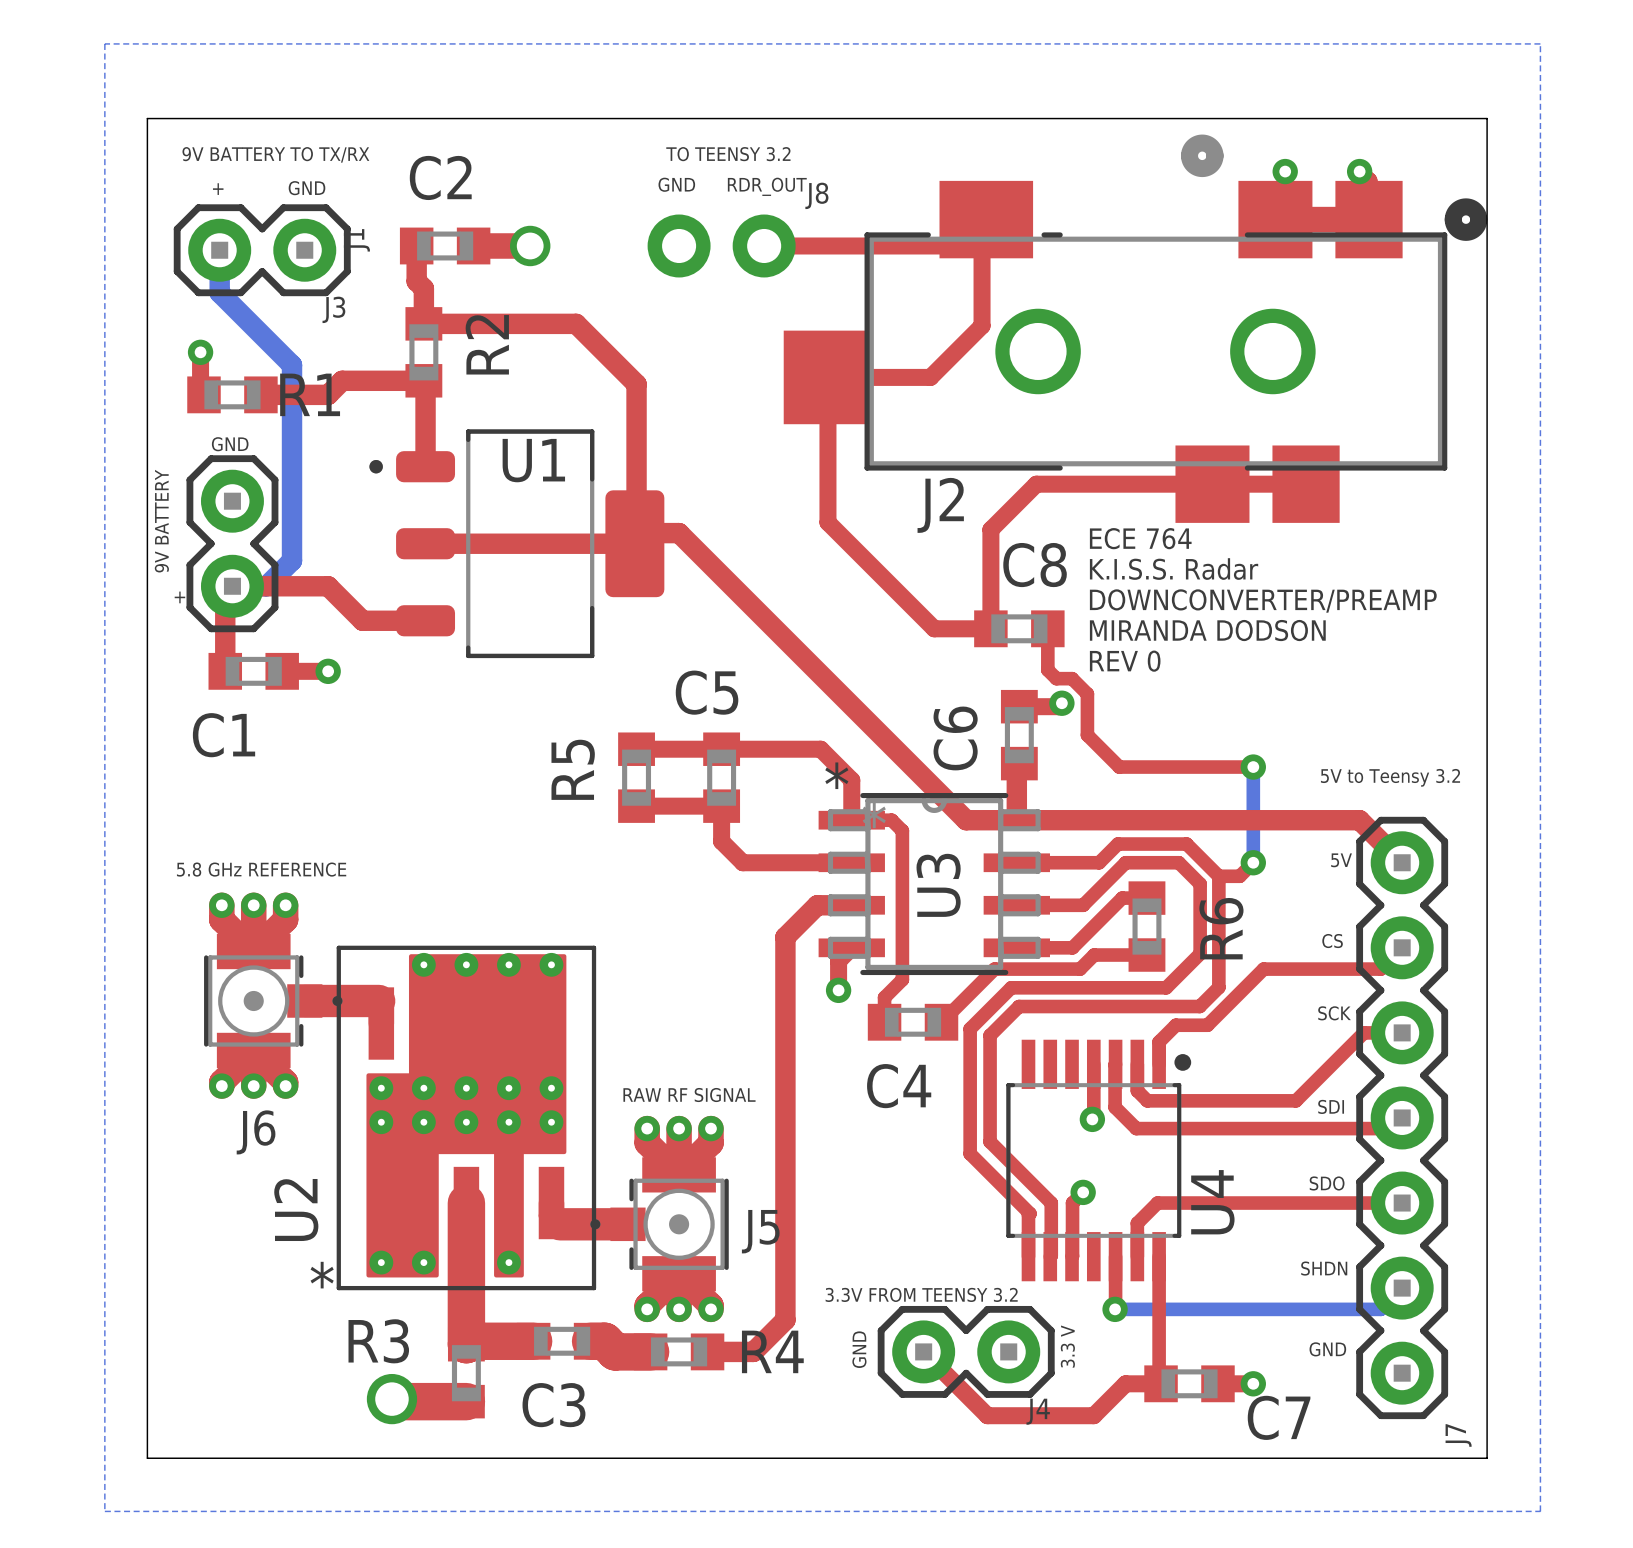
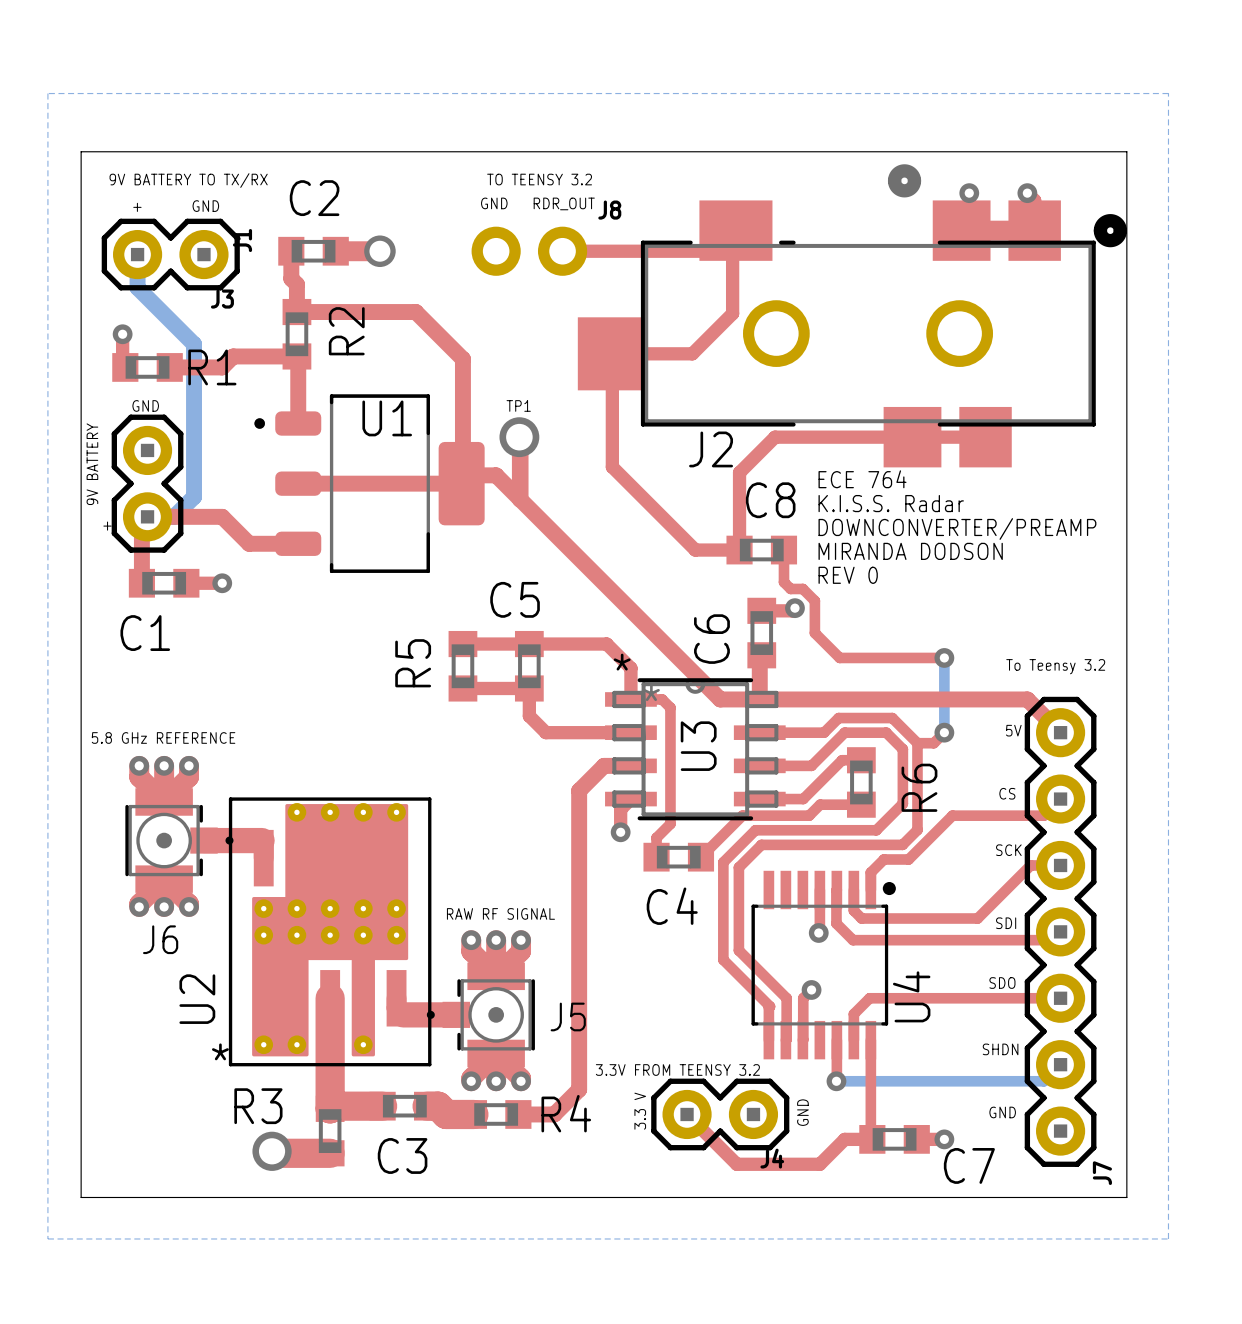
text: none -> TP1 (518, 405)
top track: none -> (519, 437) (520, 499)
via: none -> (519, 437)
text: 5V to Teensy 3.2 (1390, 777) -> To Teensy 3.2 (1055, 666)
text: 3.3 V (1067, 1346) -> GND (802, 1112)
text: GND (859, 1349) -> 3.3 V (640, 1111)

